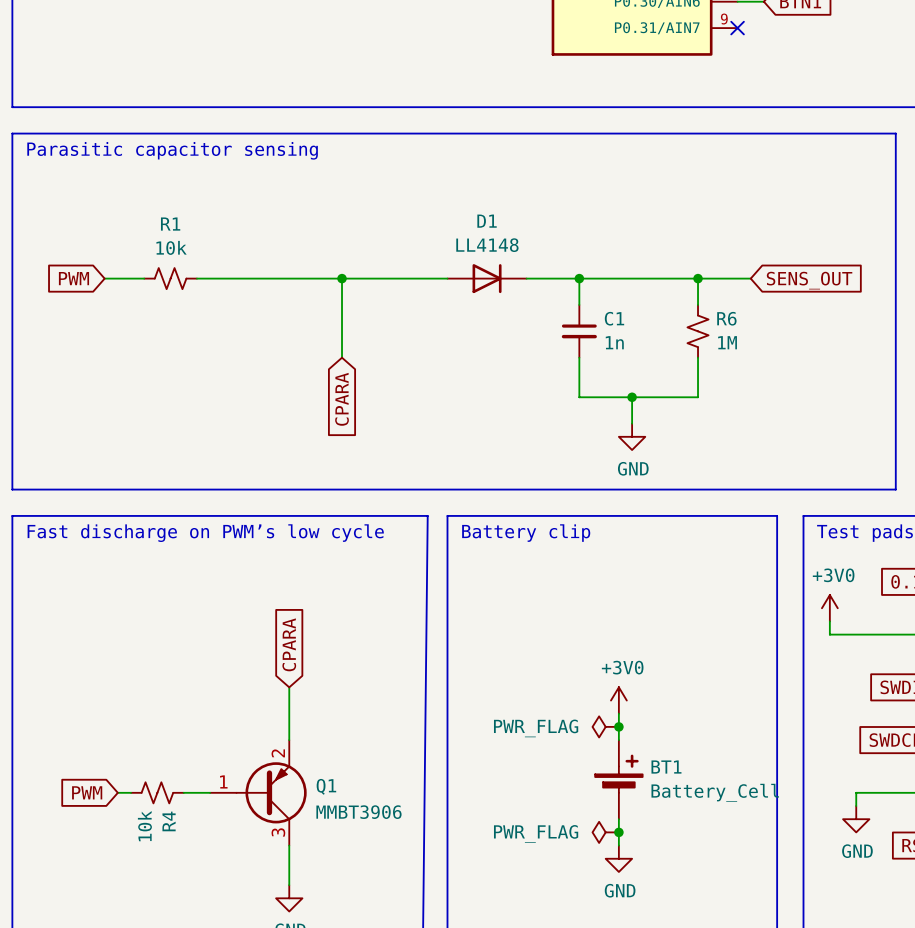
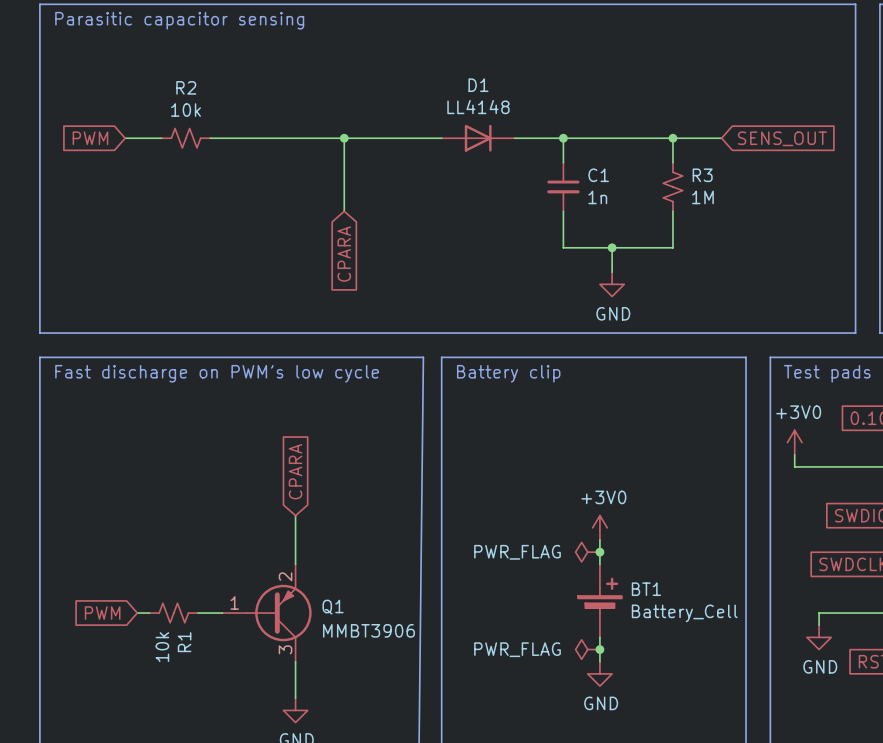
R1 name: R1 (170, 224) -> R2 (186, 87)
R6 name: R6 (726, 318) -> R3 (702, 175)
R4 name: R4 (169, 821) -> R1 (184, 642)

